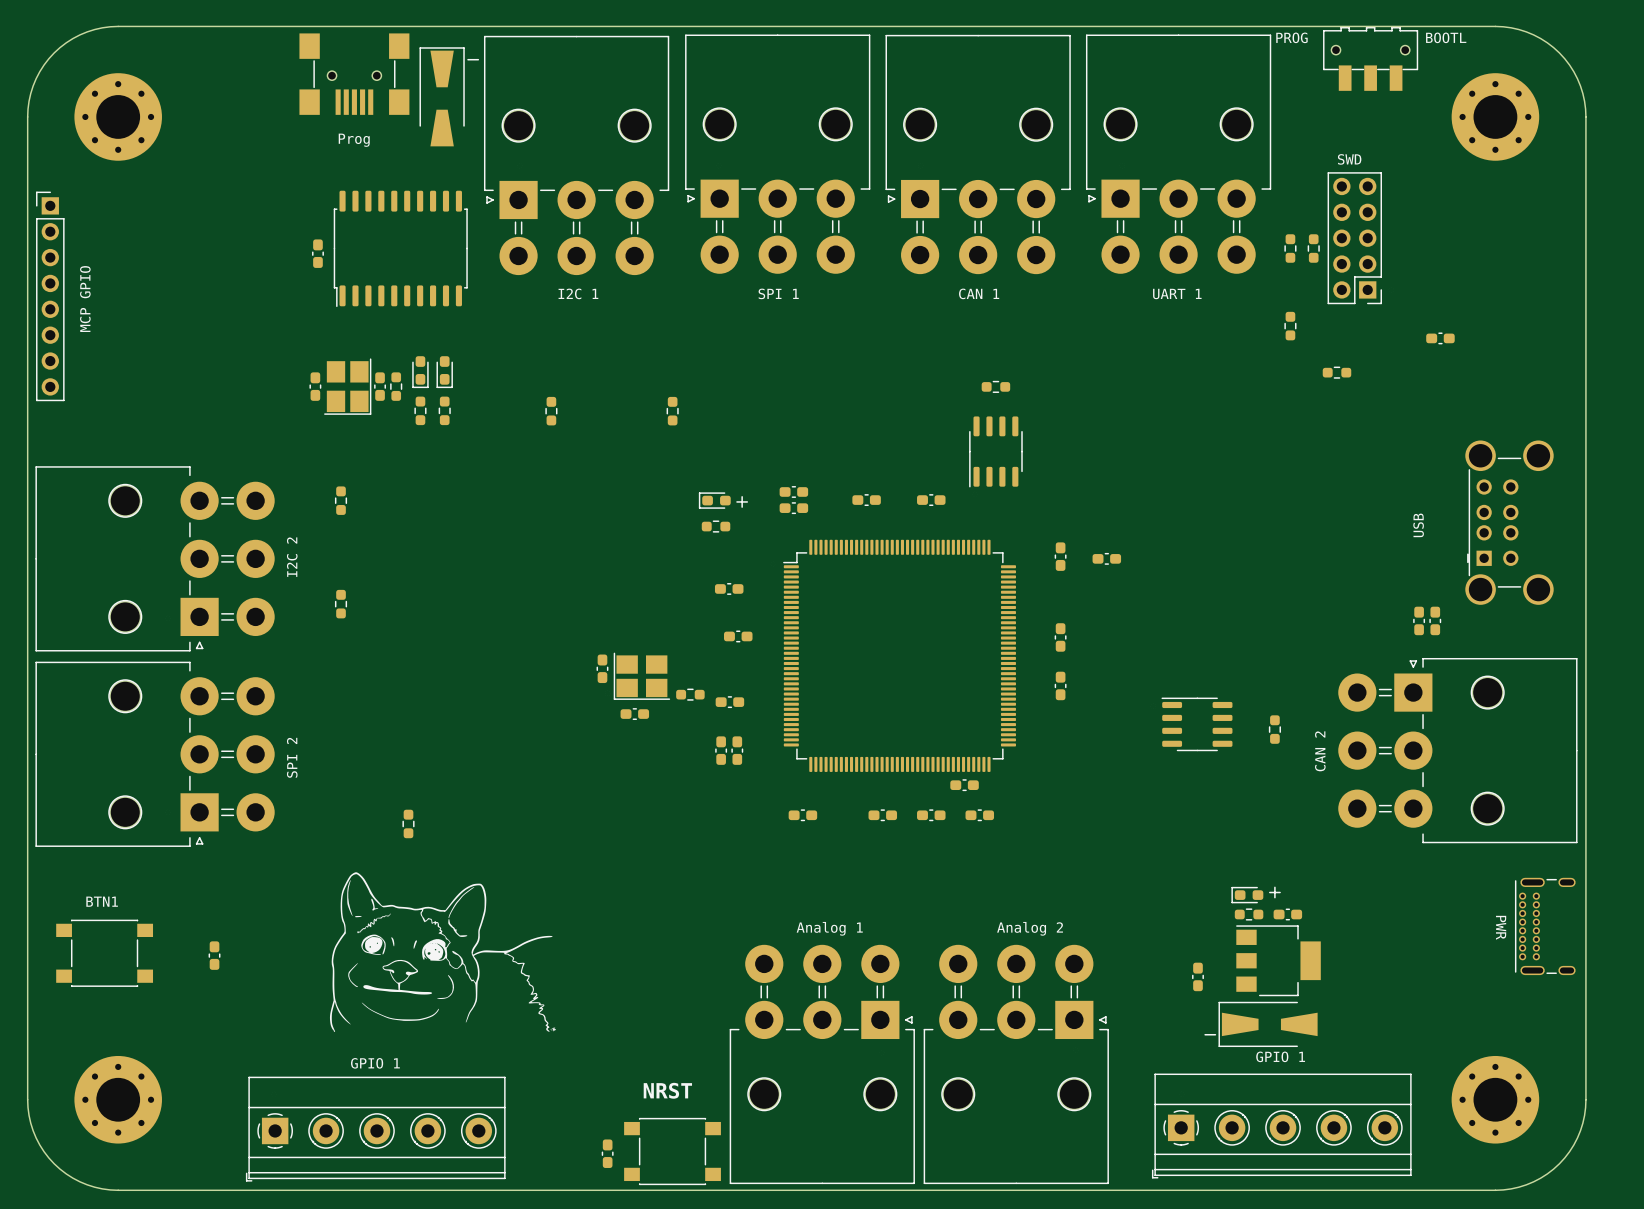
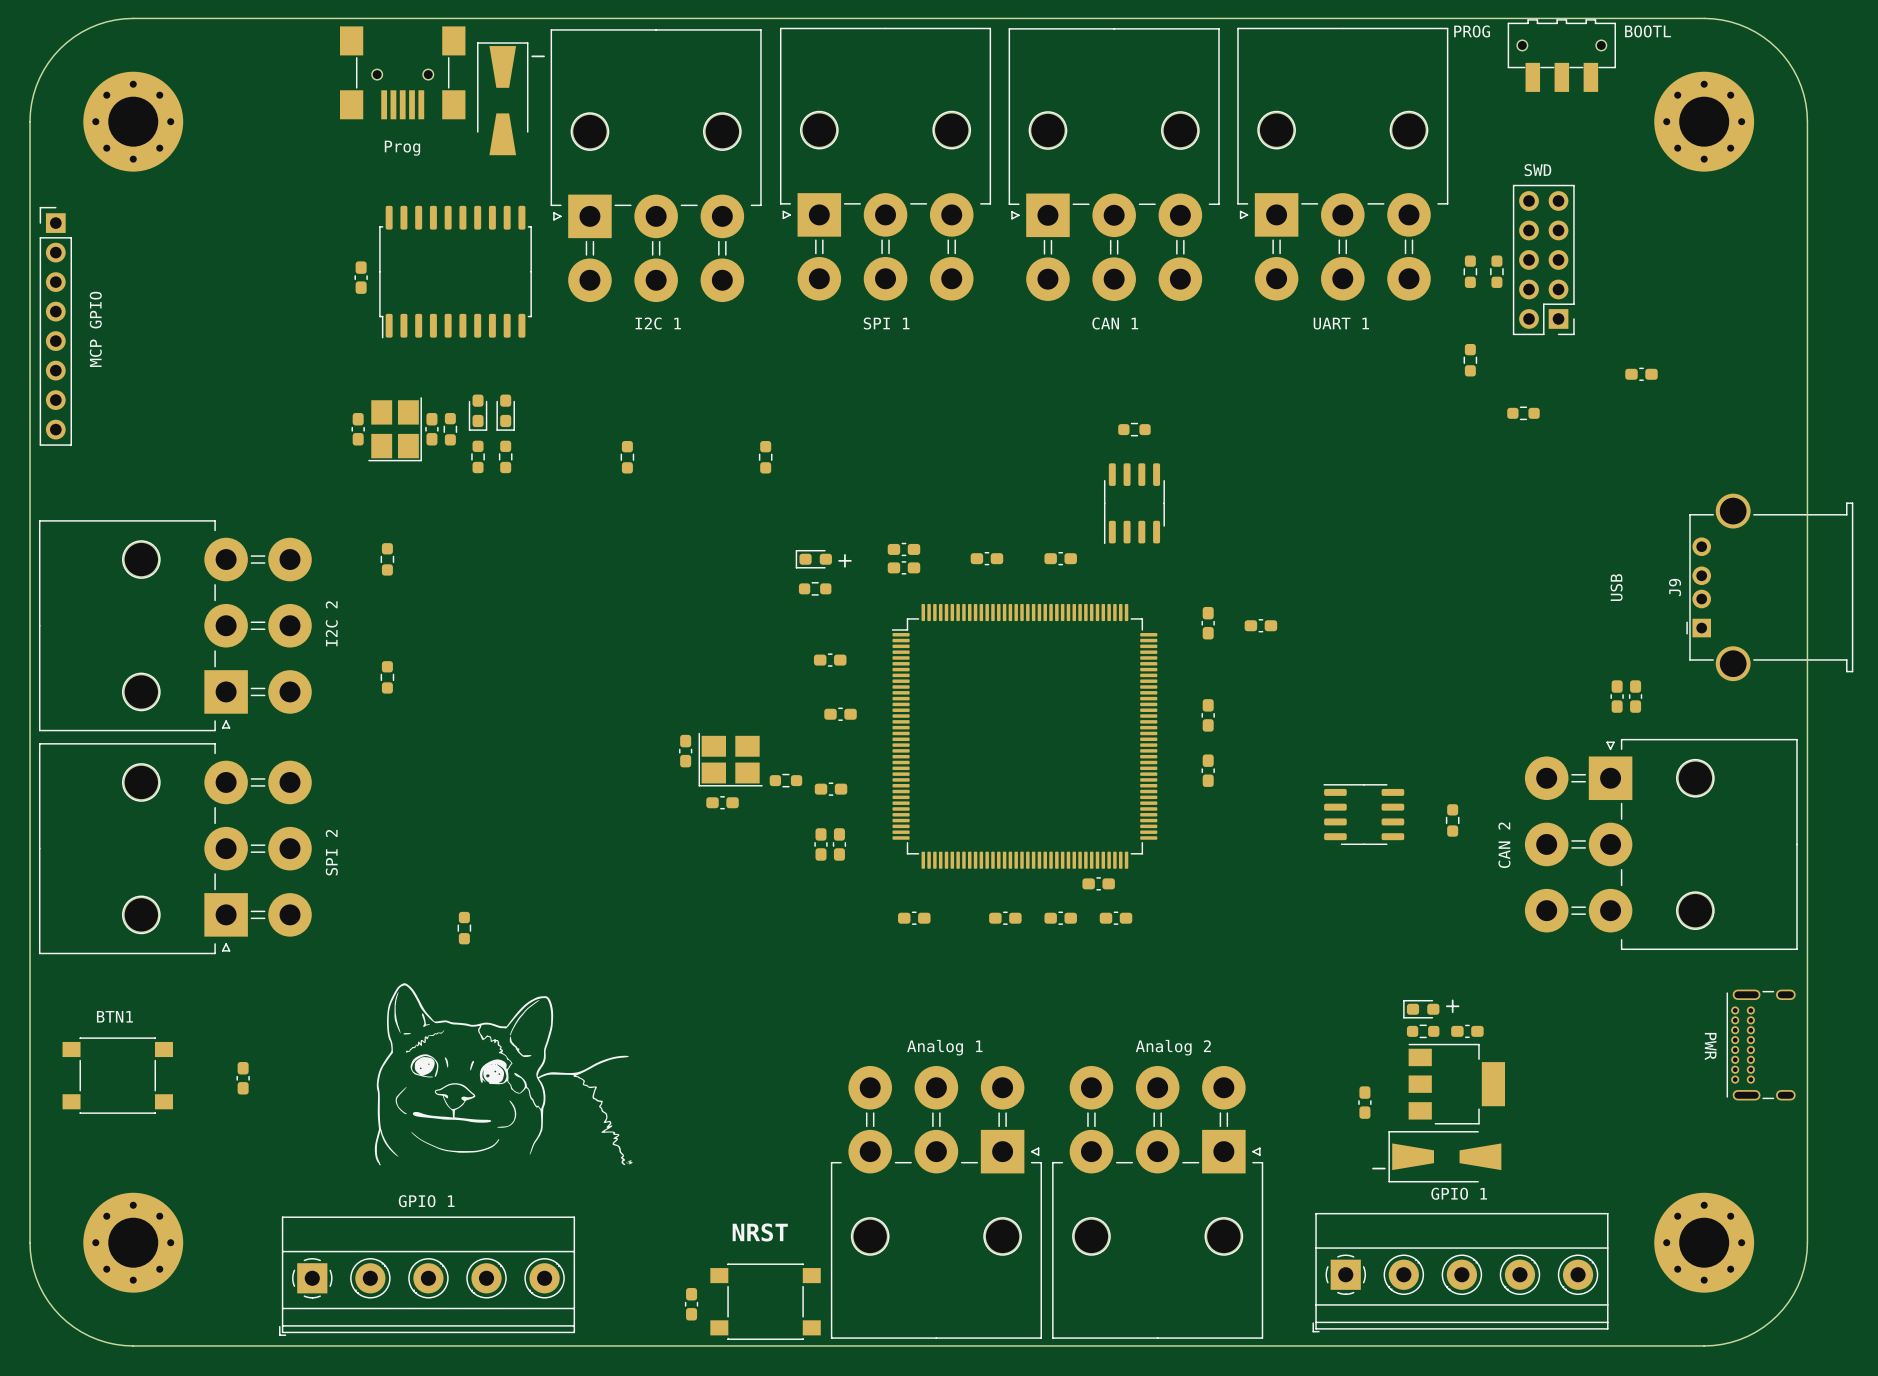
part: (1509, 522) -> none
J9: none -> (1769, 587)

